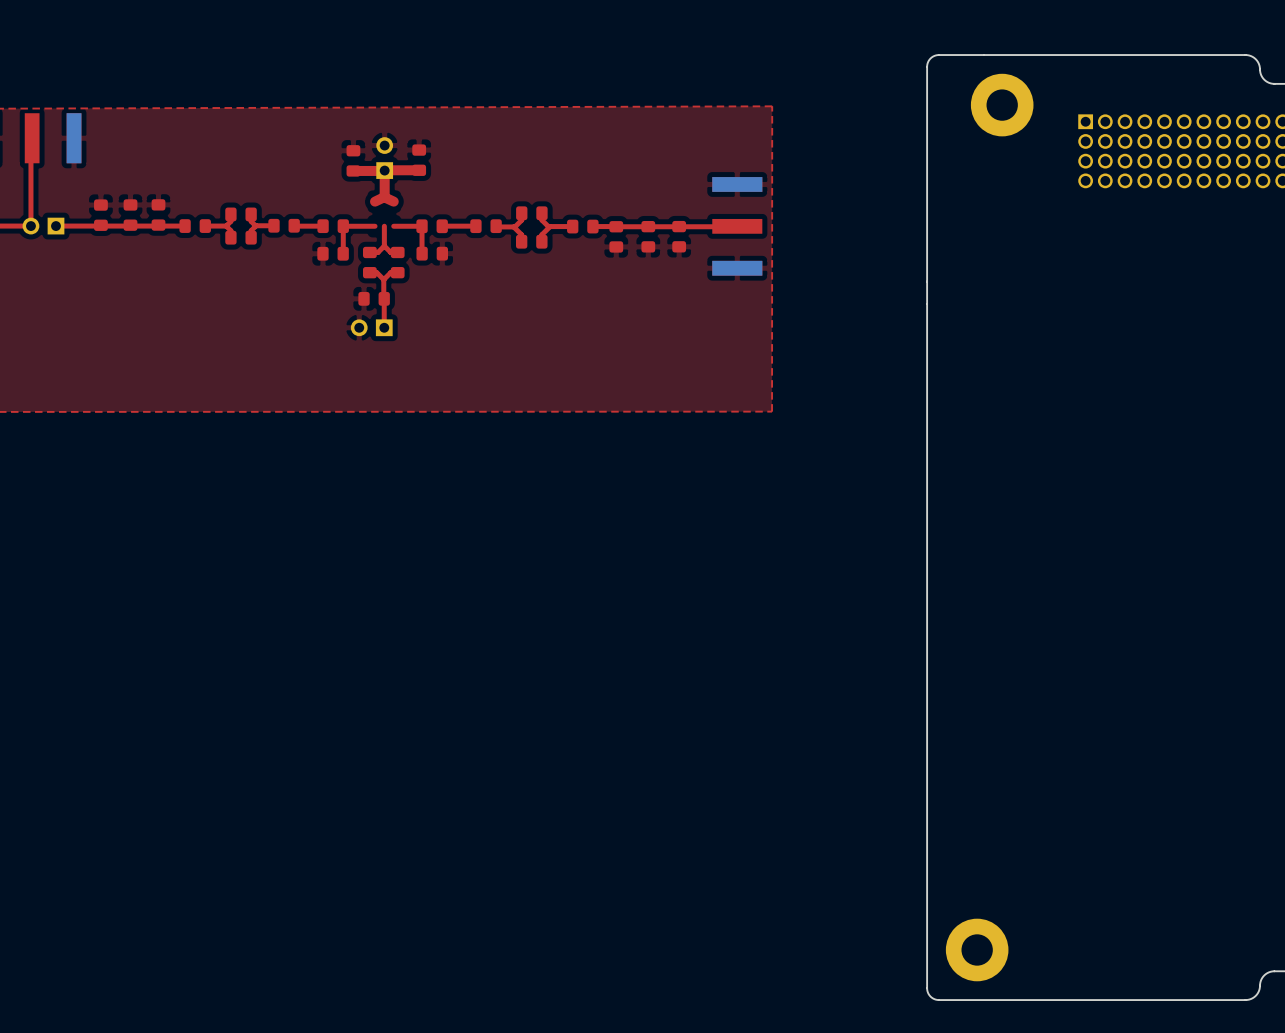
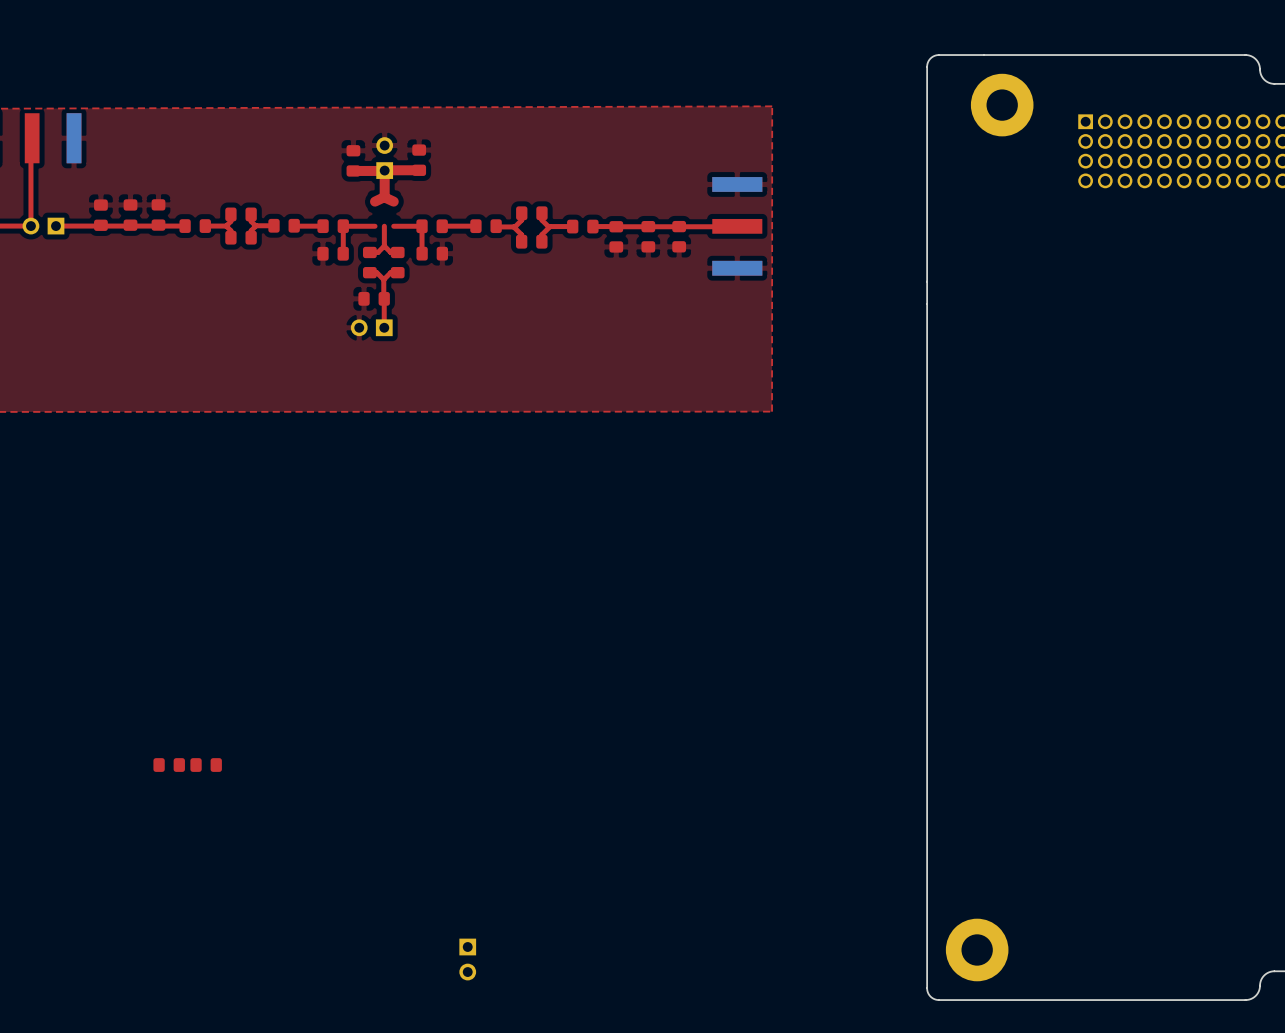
part: none -> (169, 765)
part: none -> (206, 765)
part: none -> (467, 959)

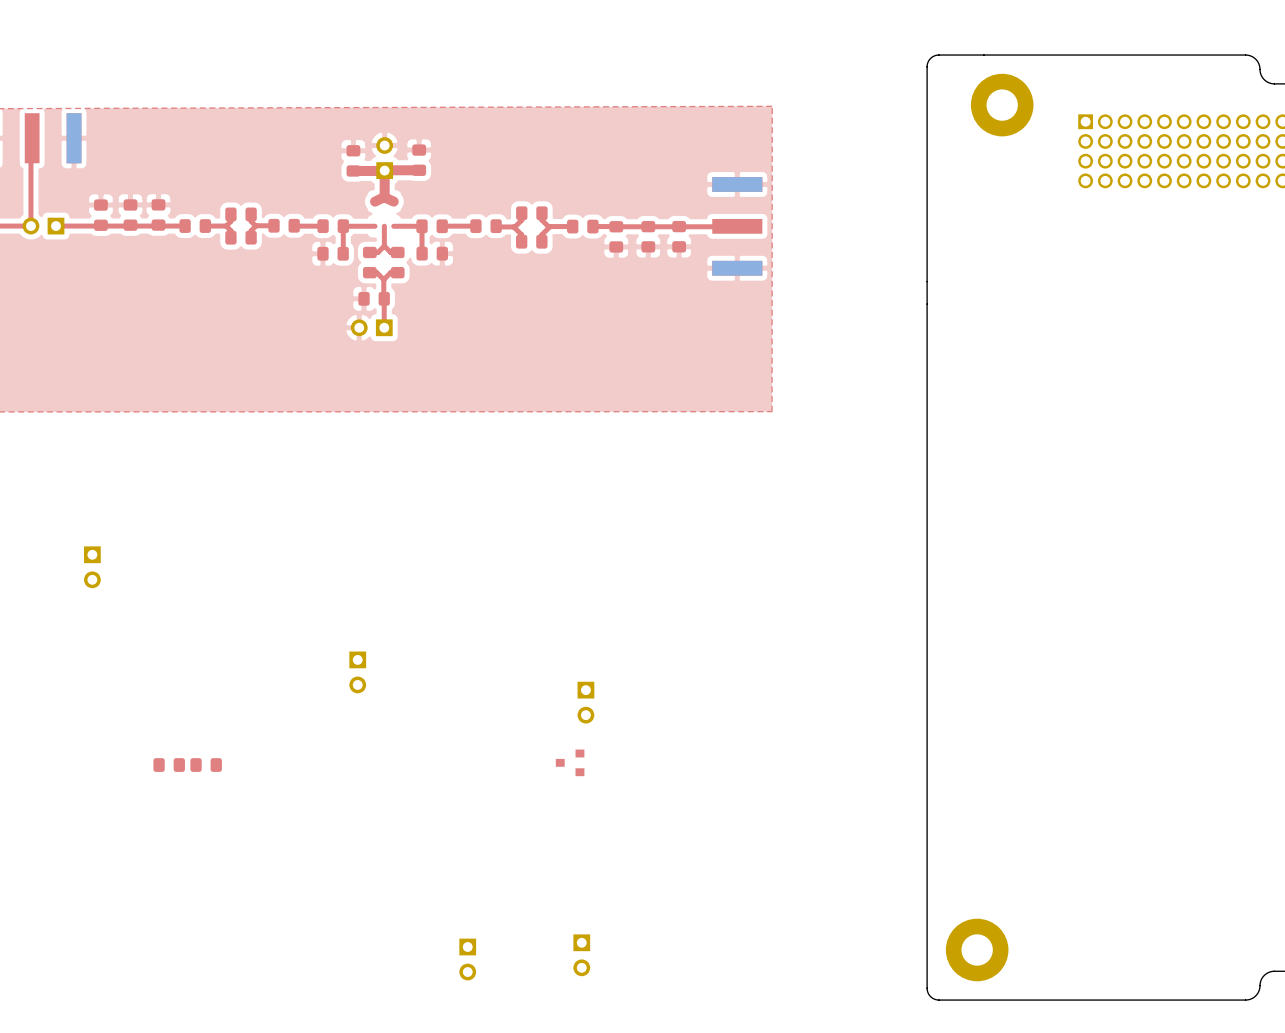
part: none -> (92, 567)
part: none -> (357, 672)
part: none -> (585, 702)
part: none -> (570, 762)
part: none -> (581, 955)

